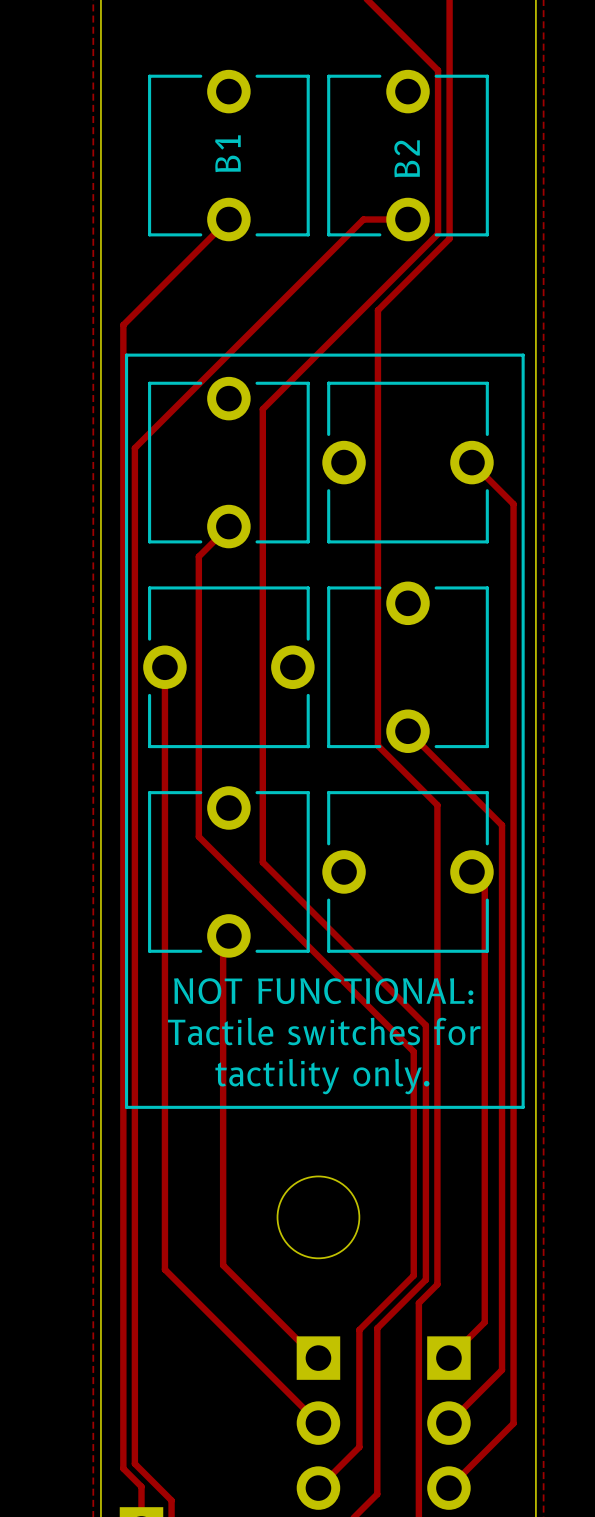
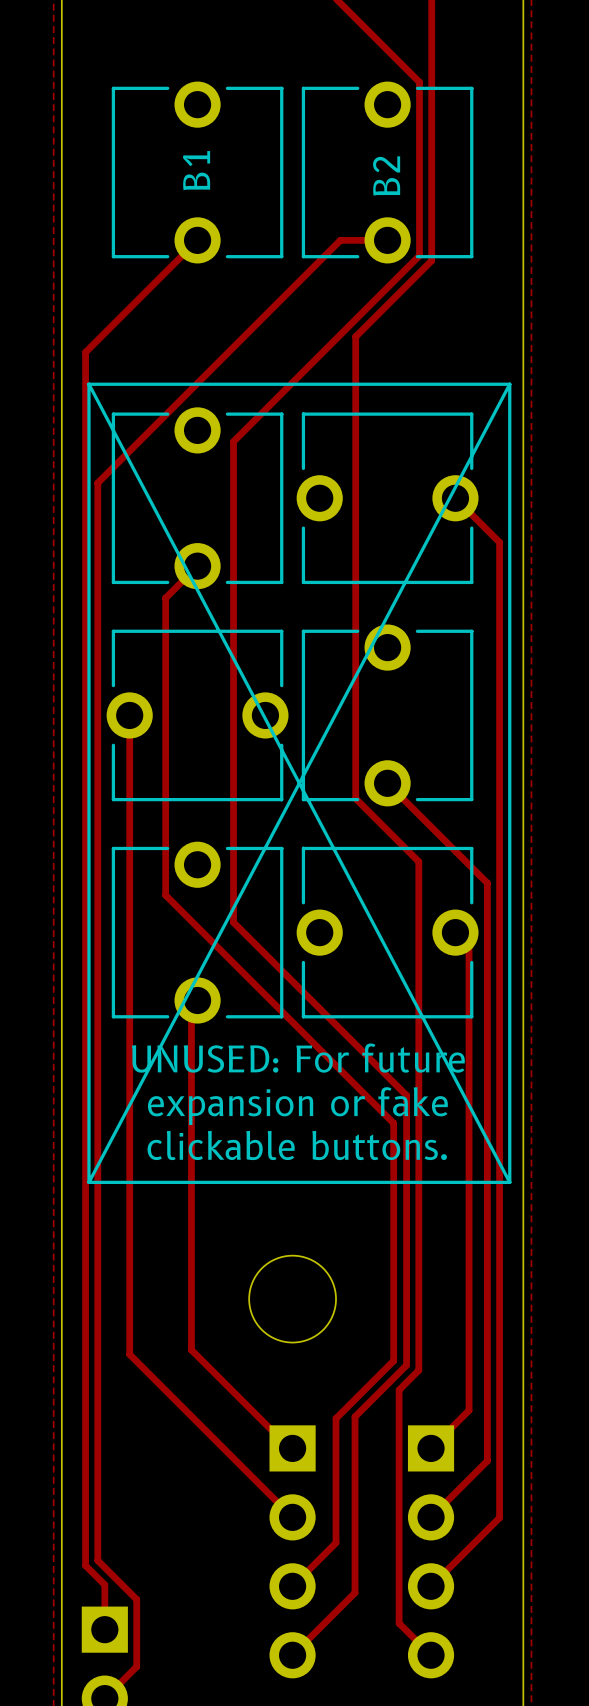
line: none -> (88, 384) (509, 1182)
line: none -> (509, 384) (88, 1182)
text: NOT FUNCTIONAL: (323, 991) -> UNUSED: For future (298, 1058)
text: Tactile switches for (324, 1031) -> expansion or fake (297, 1106)
text: tactility only. (322, 1076) -> clickable buttons. (297, 1145)

